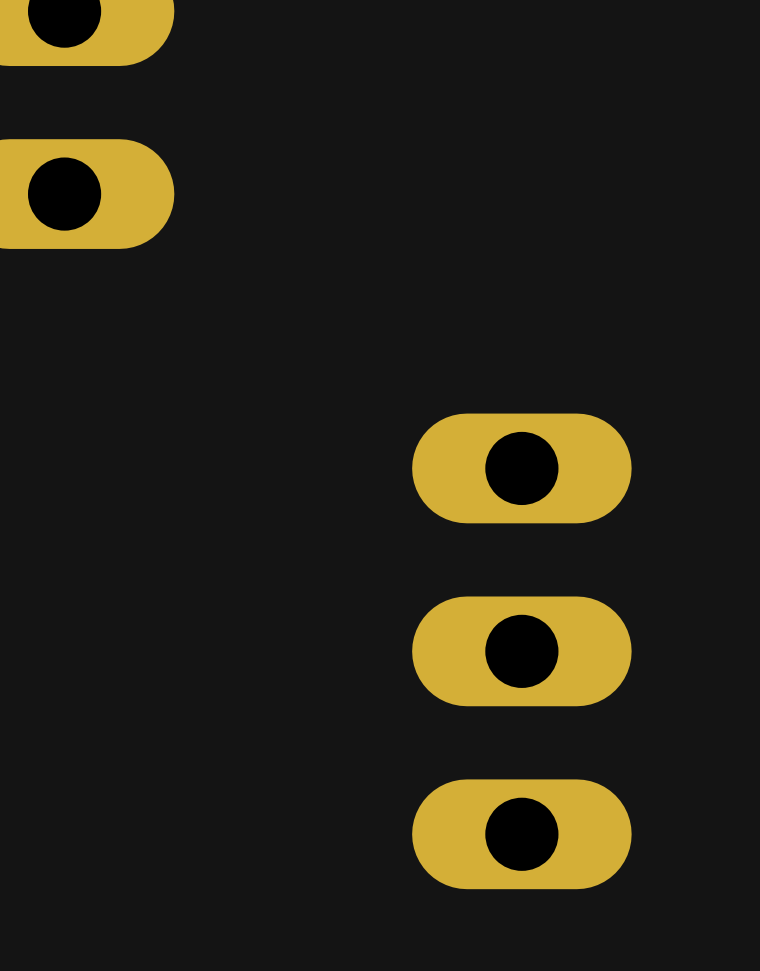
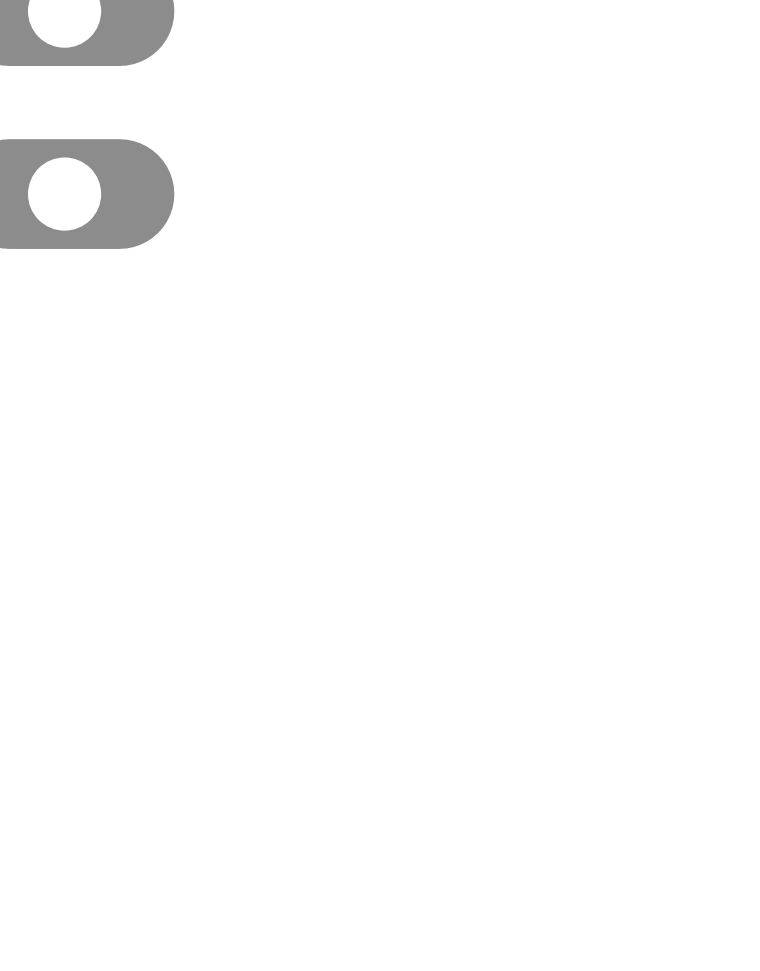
part: (521, 651) -> none

